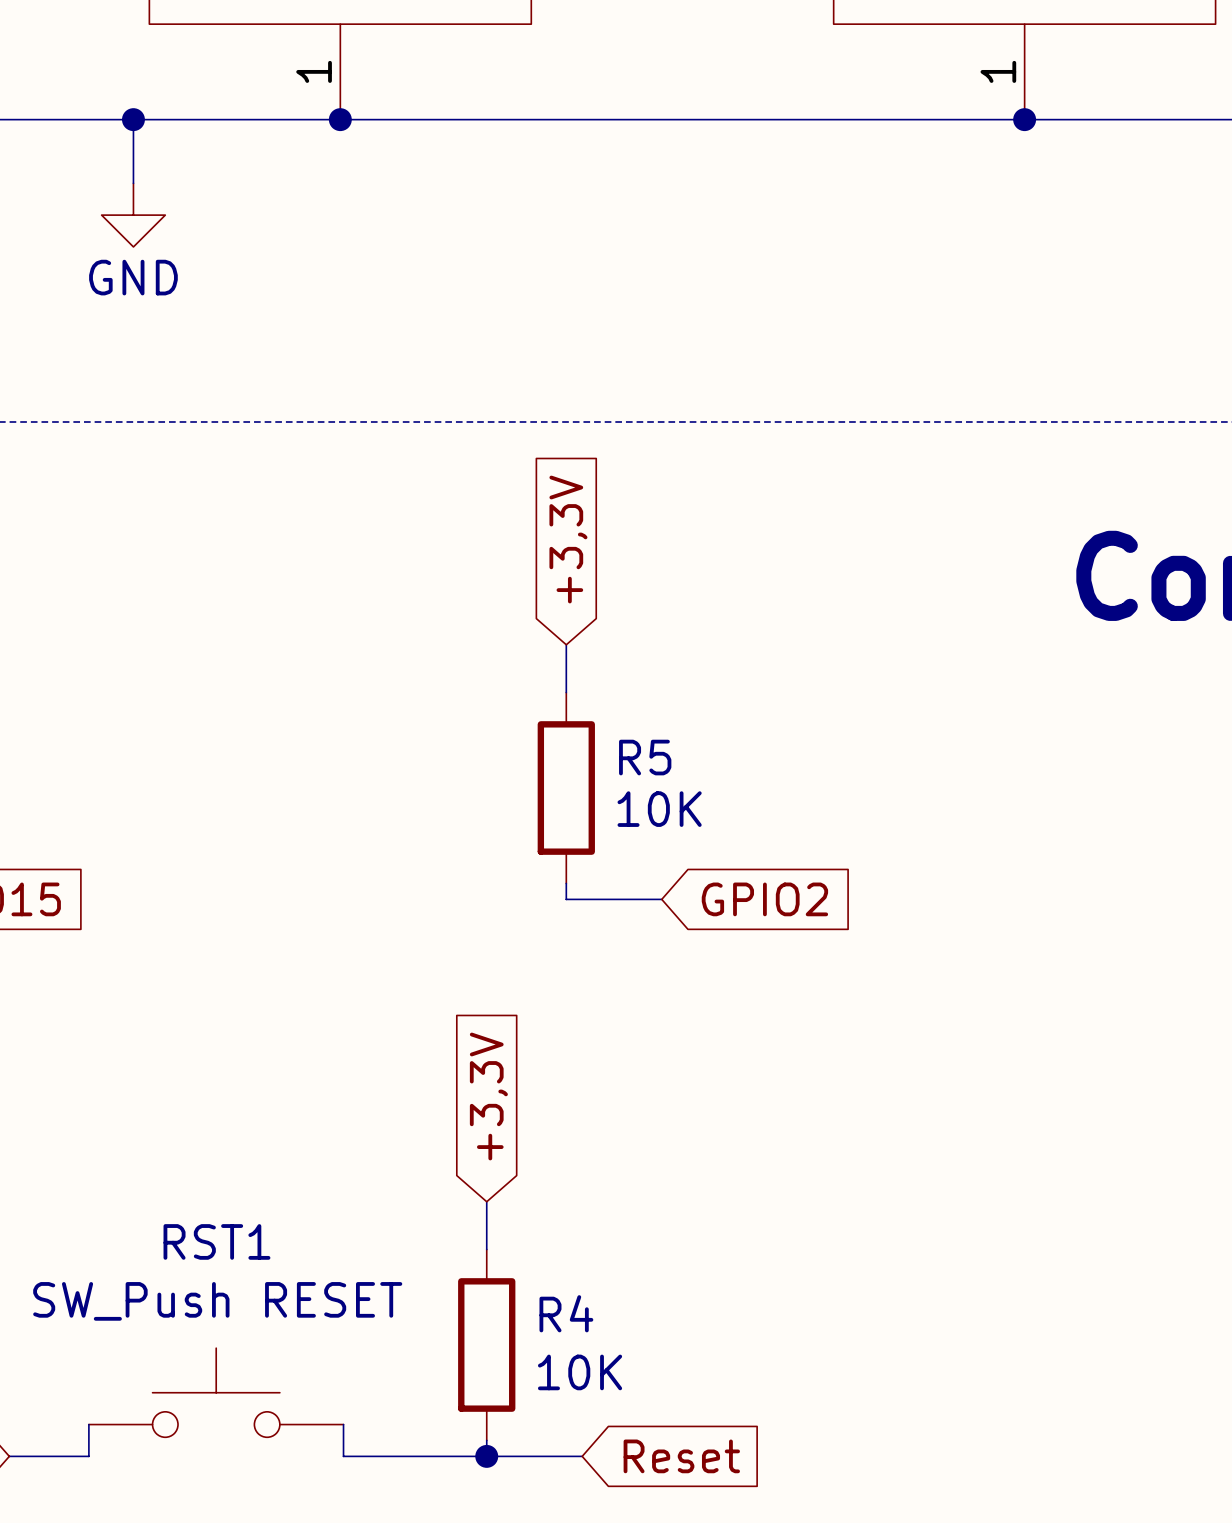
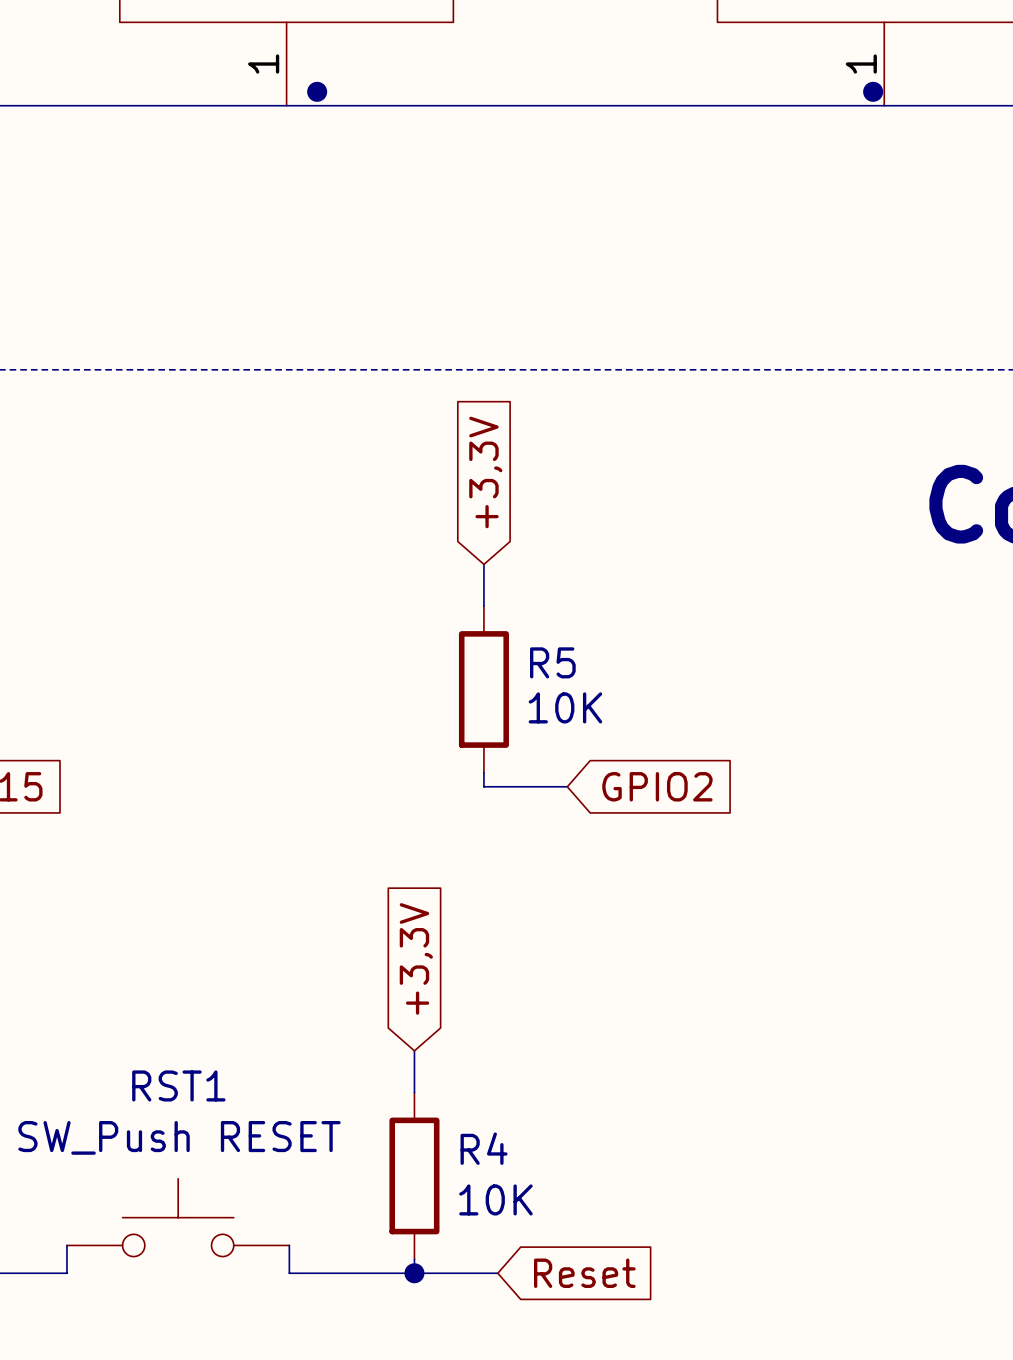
wire: (133, 119) (133, 183) -> none
junction: (133, 119) -> none
junction position: (340, 119) -> (317, 91)
junction position: (1024, 119) -> (873, 91)
power symbol: GND (133, 215) -> none

